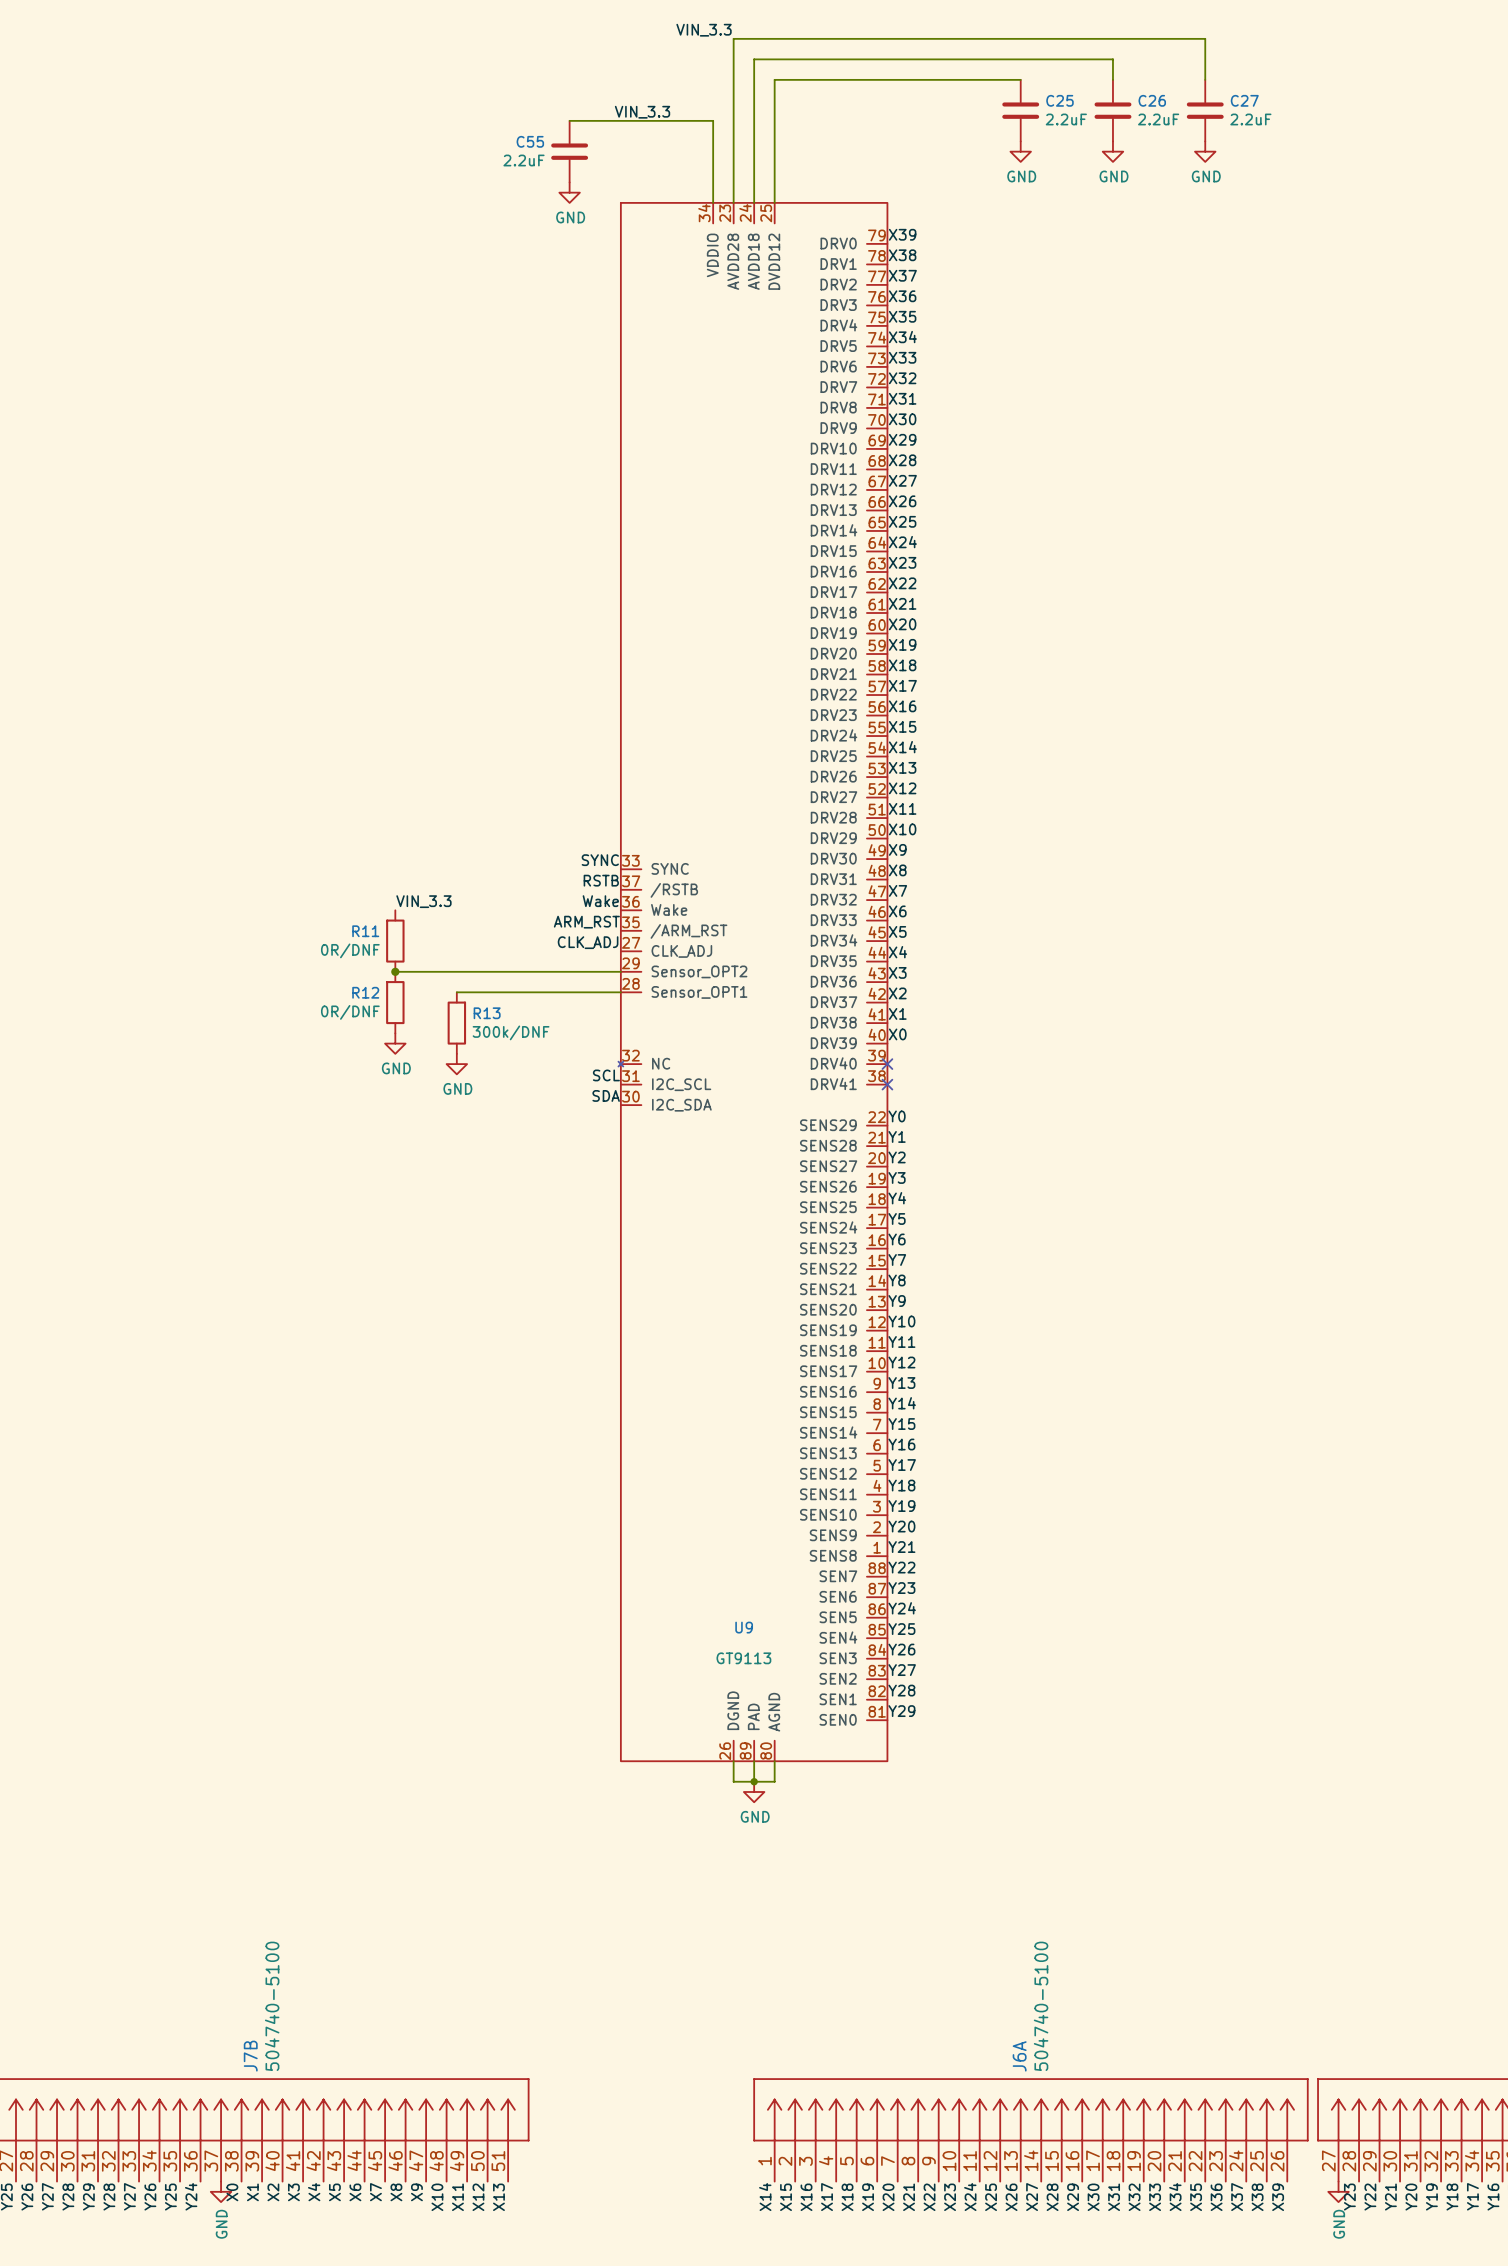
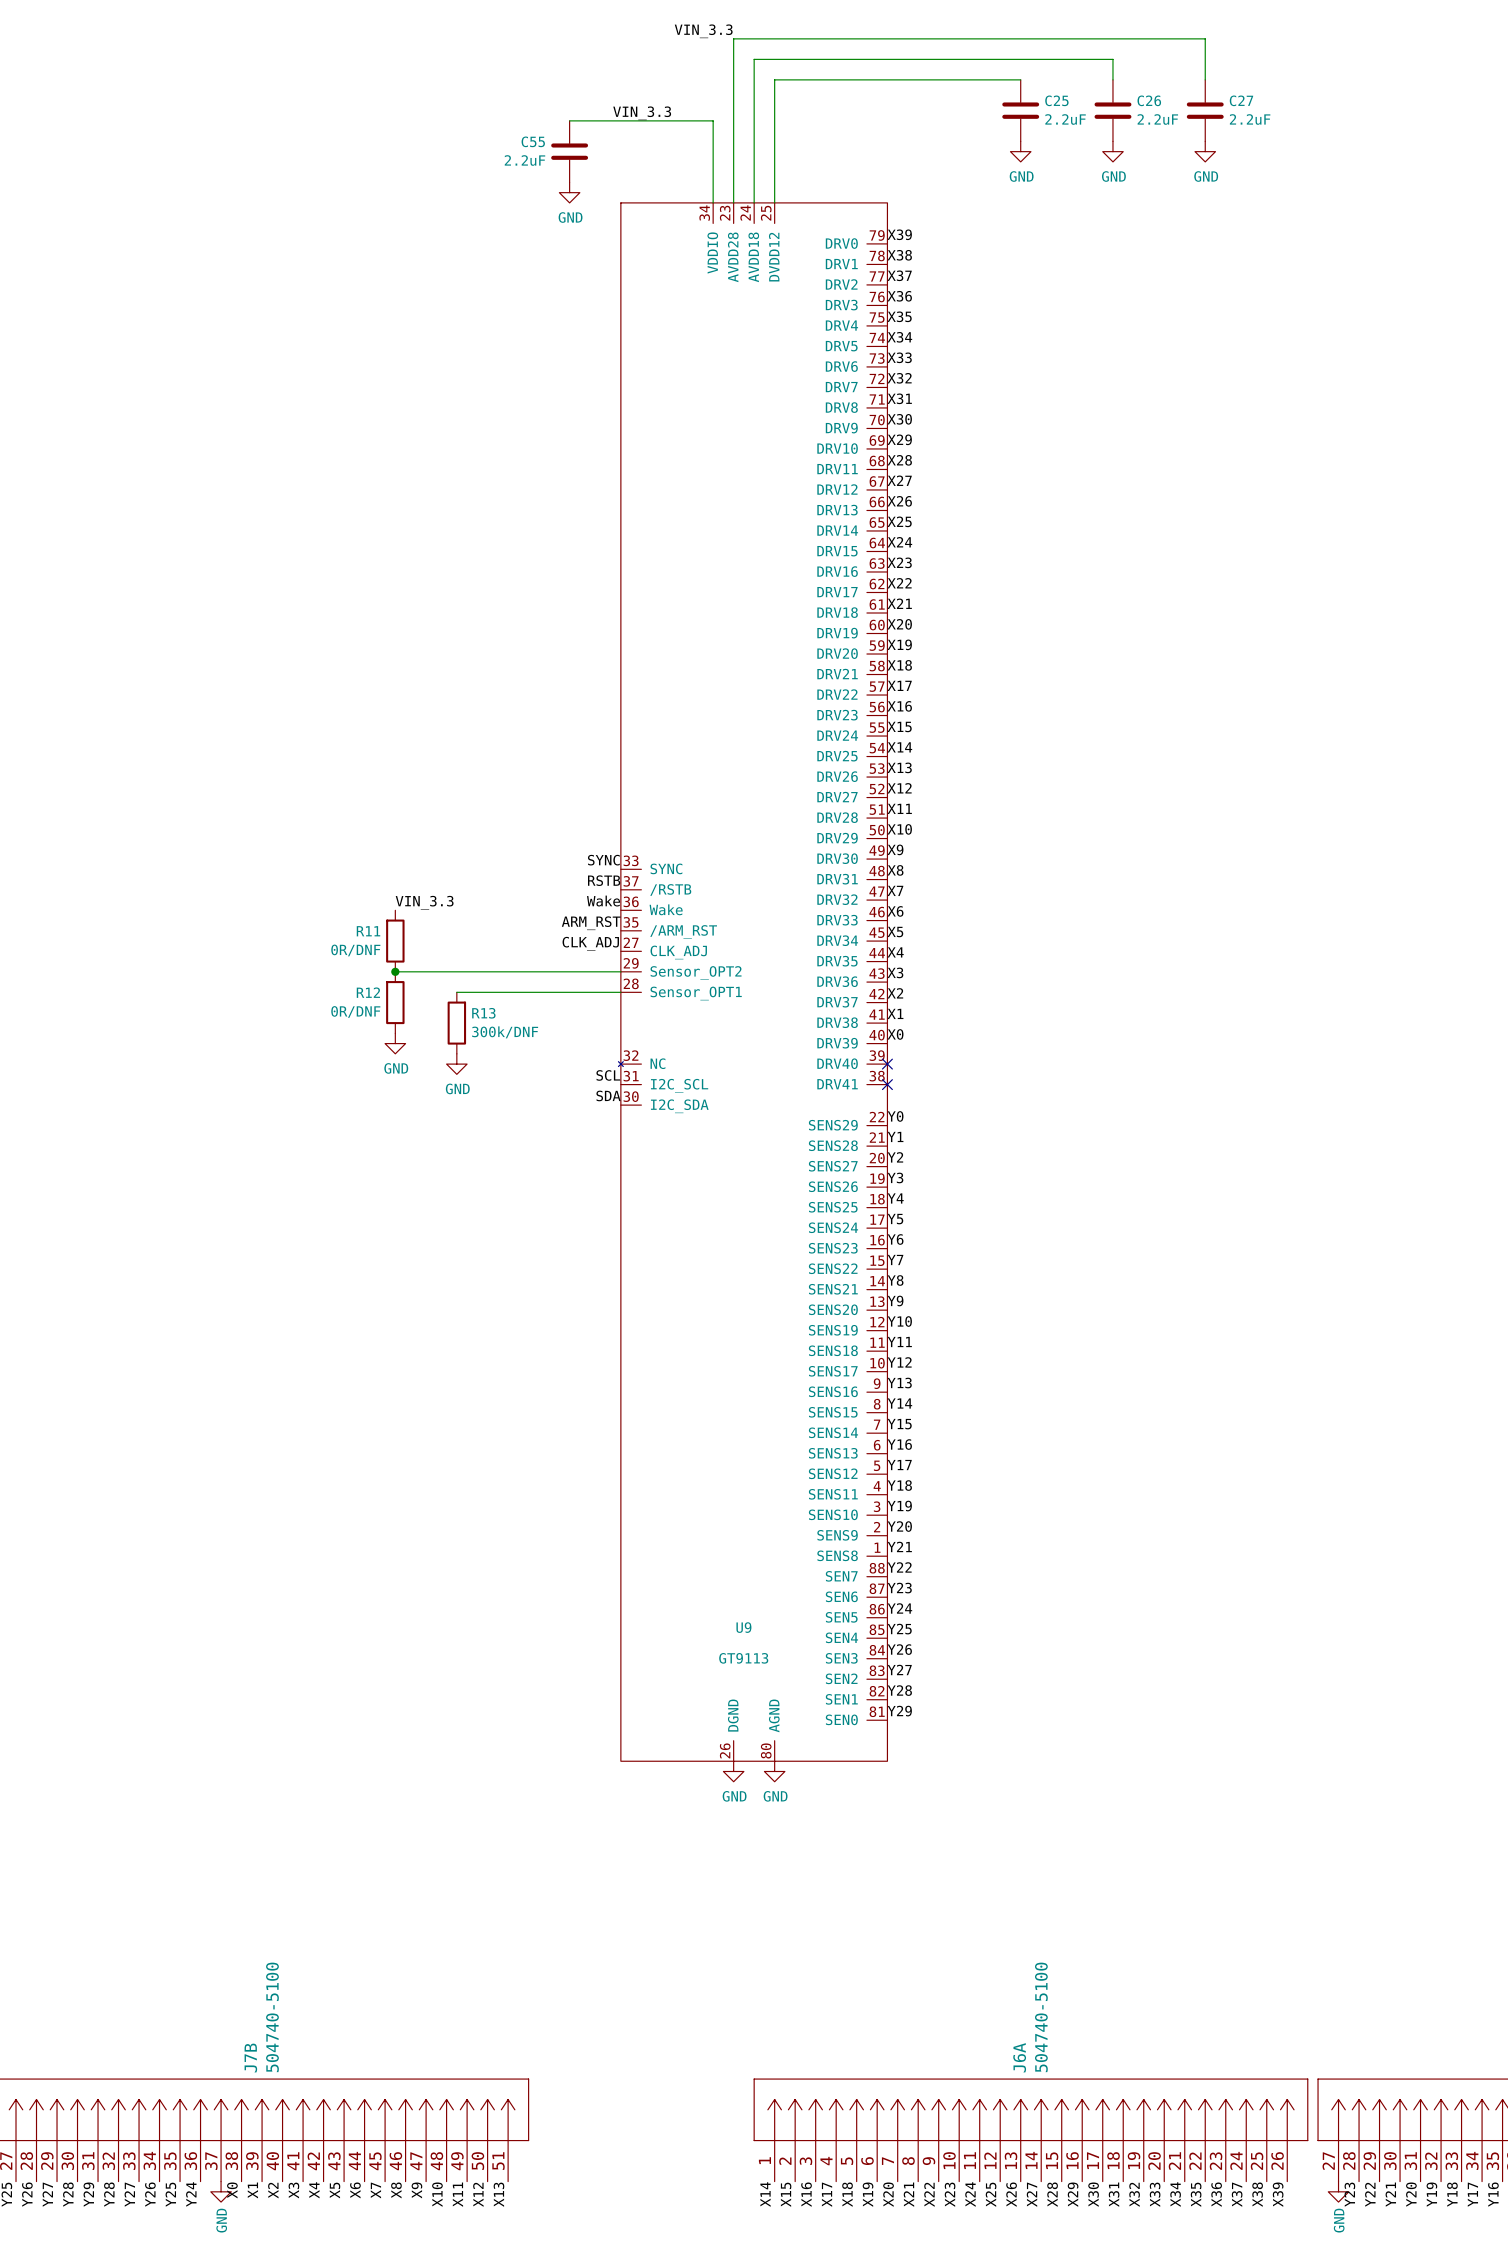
U9 symbol: [618, 202, 888, 1762] -> [618, 202, 888, 1762]
wire: (733, 1761) (733, 1781) (774, 1781) (774, 1761) -> none
wire: (754, 1761) (754, 1781) -> none
power symbol: none -> GND (733, 1771)
power symbol: none -> GND (774, 1771)
junction: (754, 1781) -> none
power symbol: GND (754, 1791) -> none

